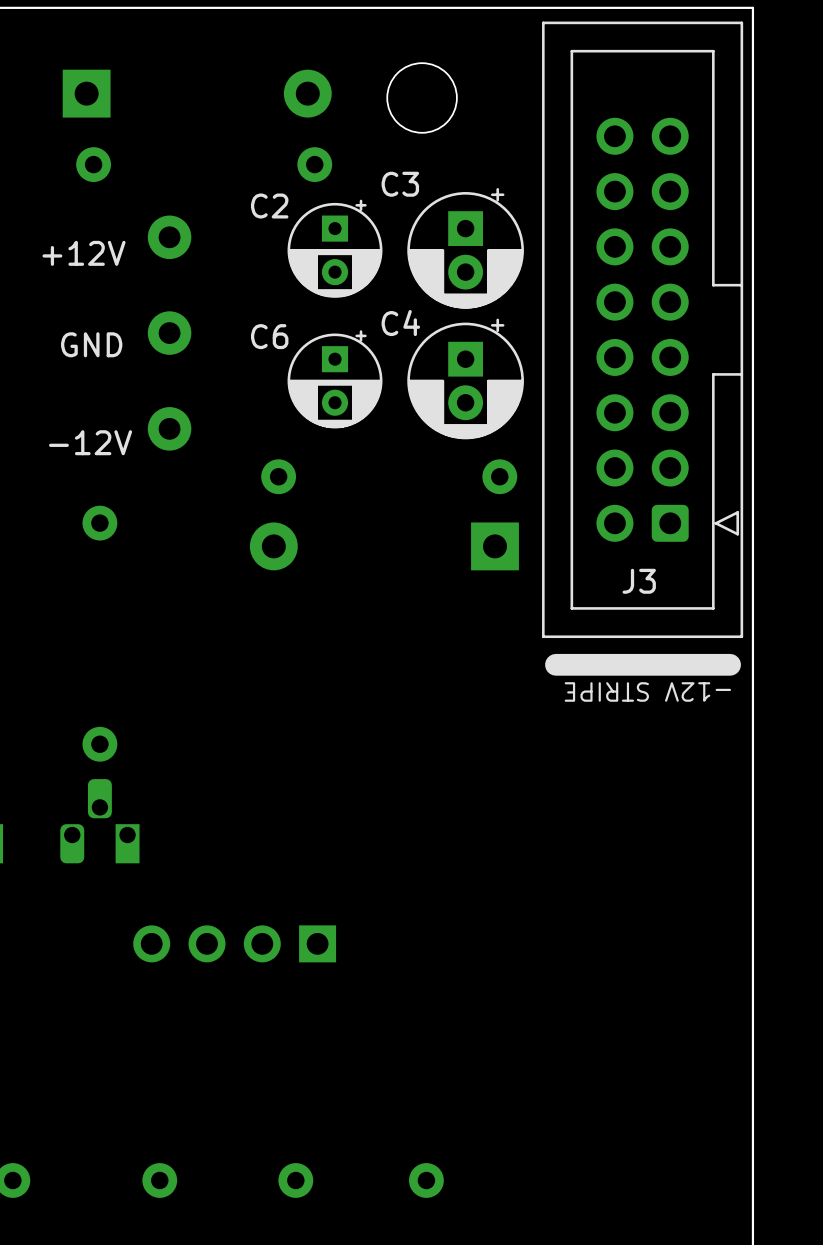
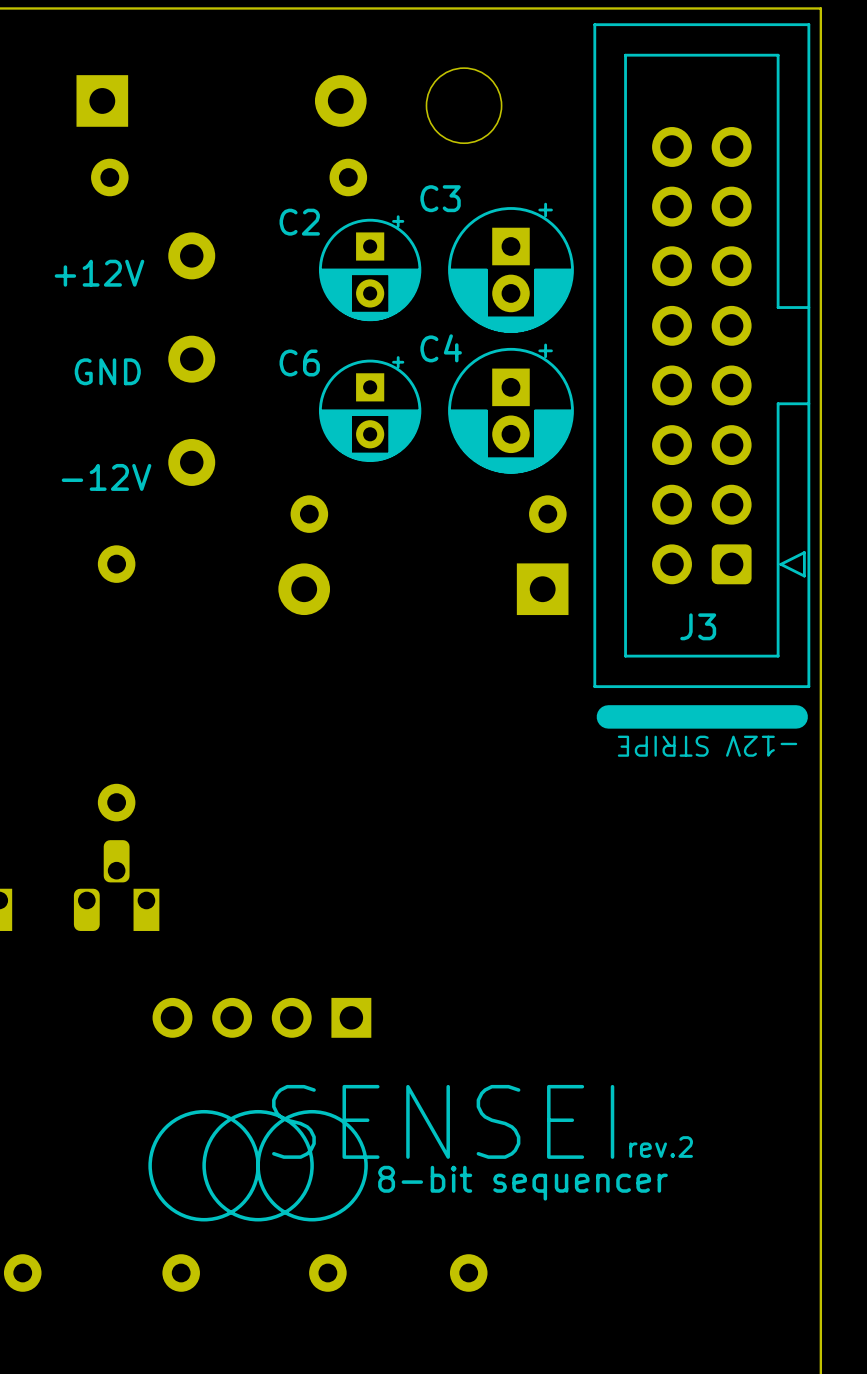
drawing: none -> [148, 1109, 368, 1222]
text: none -> SENSEI (443, 1121)
text: none -> rev.2 (661, 1146)
text: none -> 8-bit sequencer (522, 1183)

